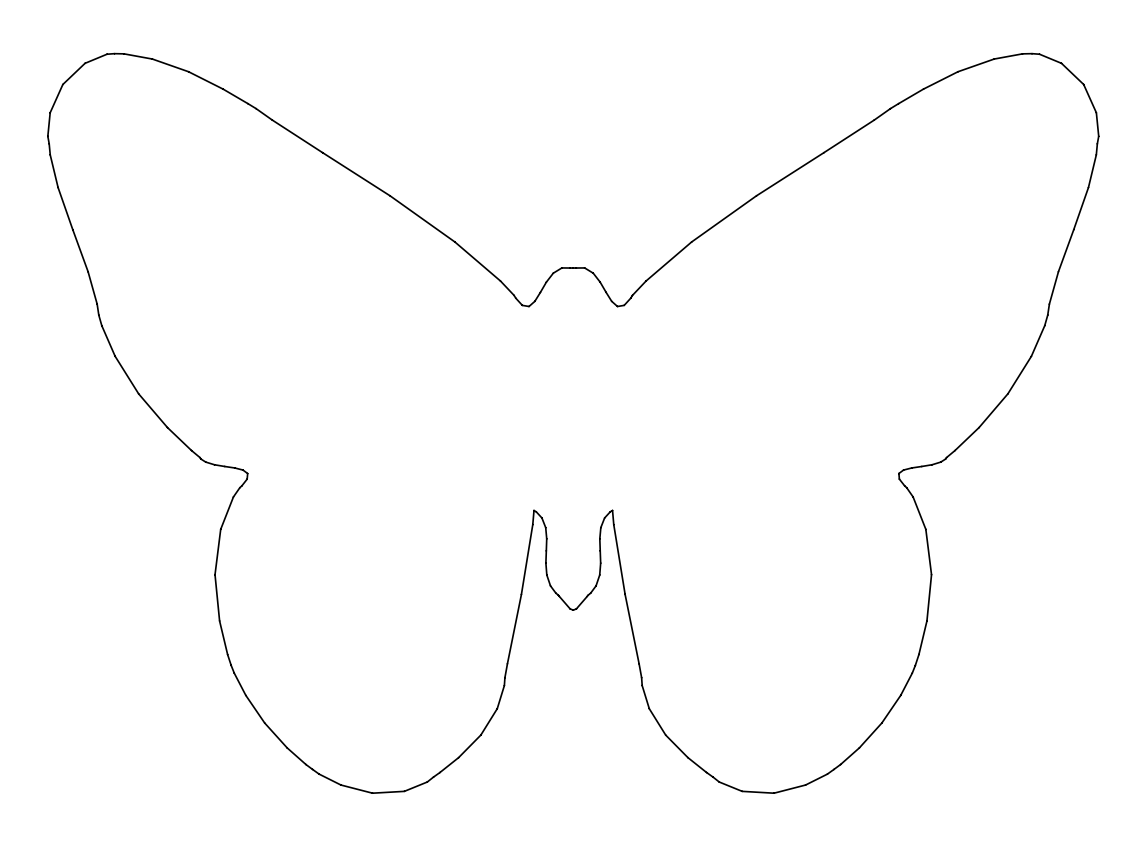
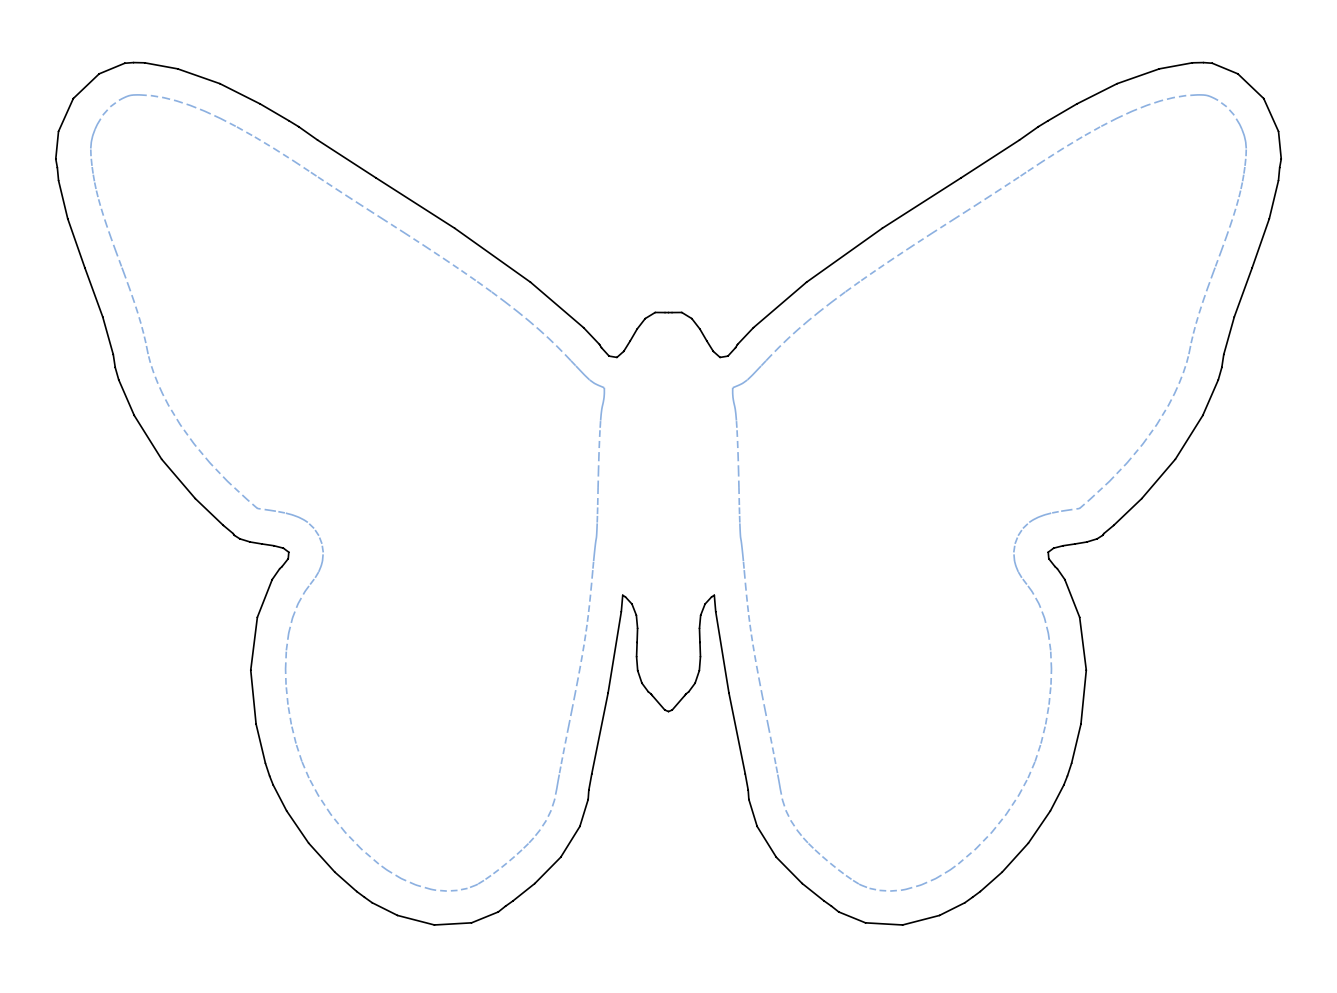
zone outline: none -> (140, 94) (176, 100) (204, 111) (274, 148) (491, 292) (538, 329) (589, 380) (604, 387) (600, 430) (596, 534) (588, 615) (554, 799) (546, 820) (533, 837) (506, 863) (476, 885) (457, 890) (436, 890) (416, 885) (386, 870) (361, 849) (330, 814) (318, 795) (301, 761) (288, 704) (286, 650) (292, 617) (298, 603) (321, 565) (323, 552) (321, 543) (314, 528) (304, 519) (284, 512) (257, 508) (227, 481) (210, 462) (180, 424) (157, 383) (150, 362) (137, 313) (100, 205) (91, 156) (92, 135) (103, 114) (122, 98) (140, 94)
zone outline: none -> (1200, 94) (1218, 100) (1233, 114) (1244, 135) (1246, 156) (1236, 205) (1199, 313) (1186, 362) (1179, 383) (1156, 424) (1127, 462) (1109, 481) (1079, 508) (1052, 512) (1032, 519) (1022, 528) (1015, 543) (1013, 552) (1015, 565) (1039, 603) (1044, 617) (1050, 650) (1051, 684) (1045, 724) (1035, 761) (1028, 778) (1006, 814) (991, 832) (975, 849) (950, 870) (921, 885) (901, 890) (879, 890) (860, 885) (830, 863) (803, 837) (790, 820) (782, 799) (748, 615) (740, 534) (737, 430) (732, 387) (747, 380) (798, 329) (845, 292) (1062, 148) (1116, 118) (1147, 105) (1173, 97) (1200, 94)

